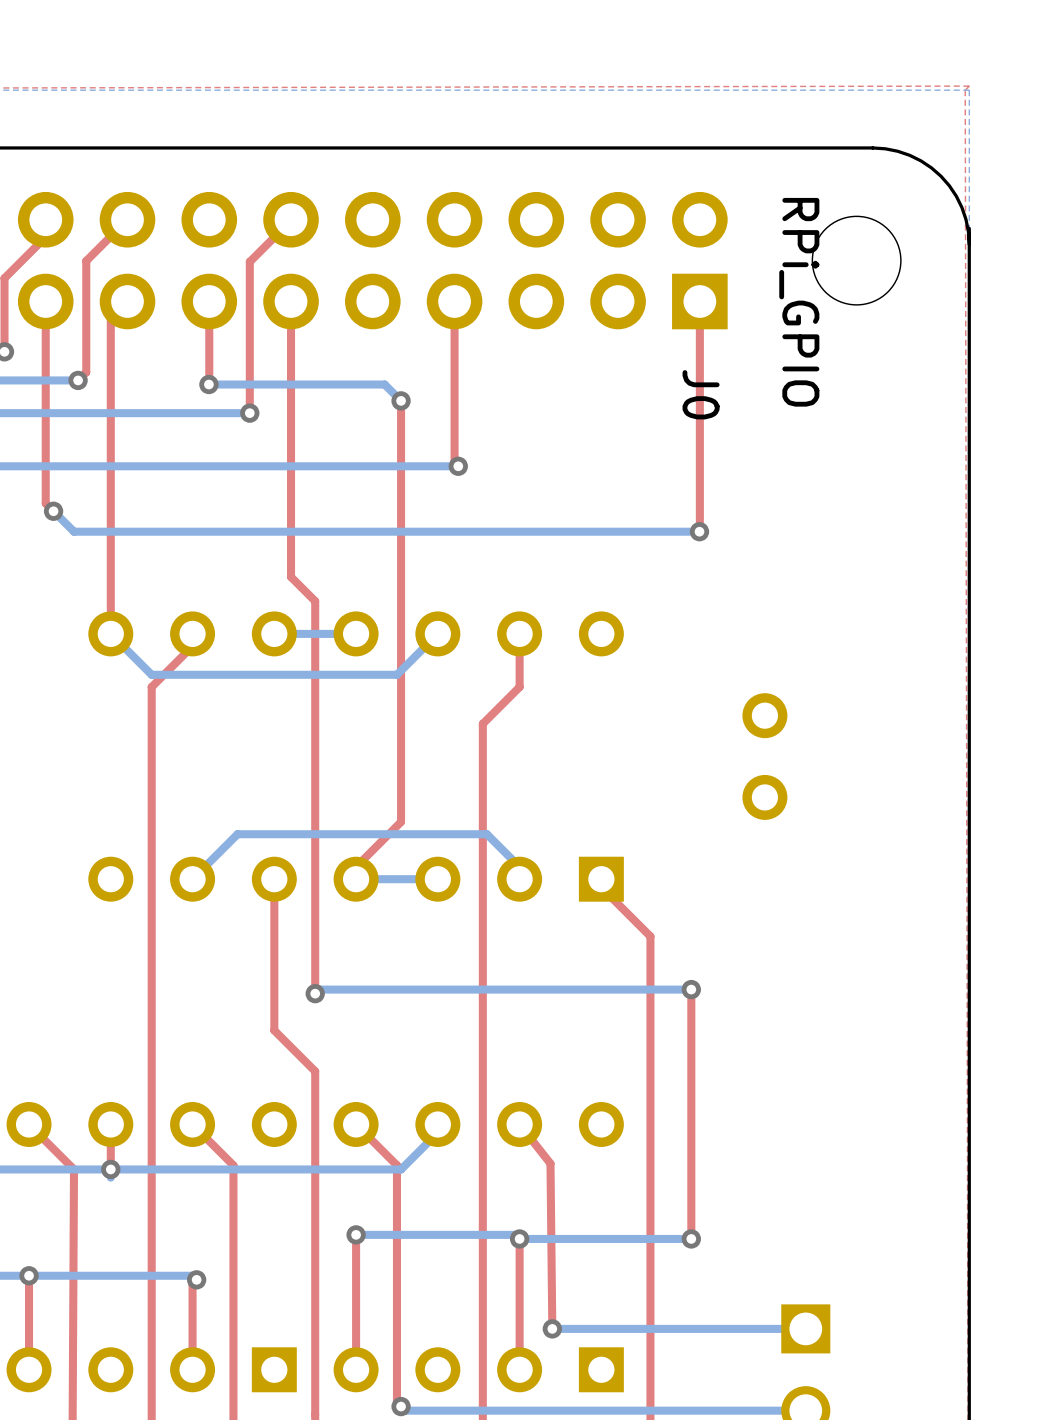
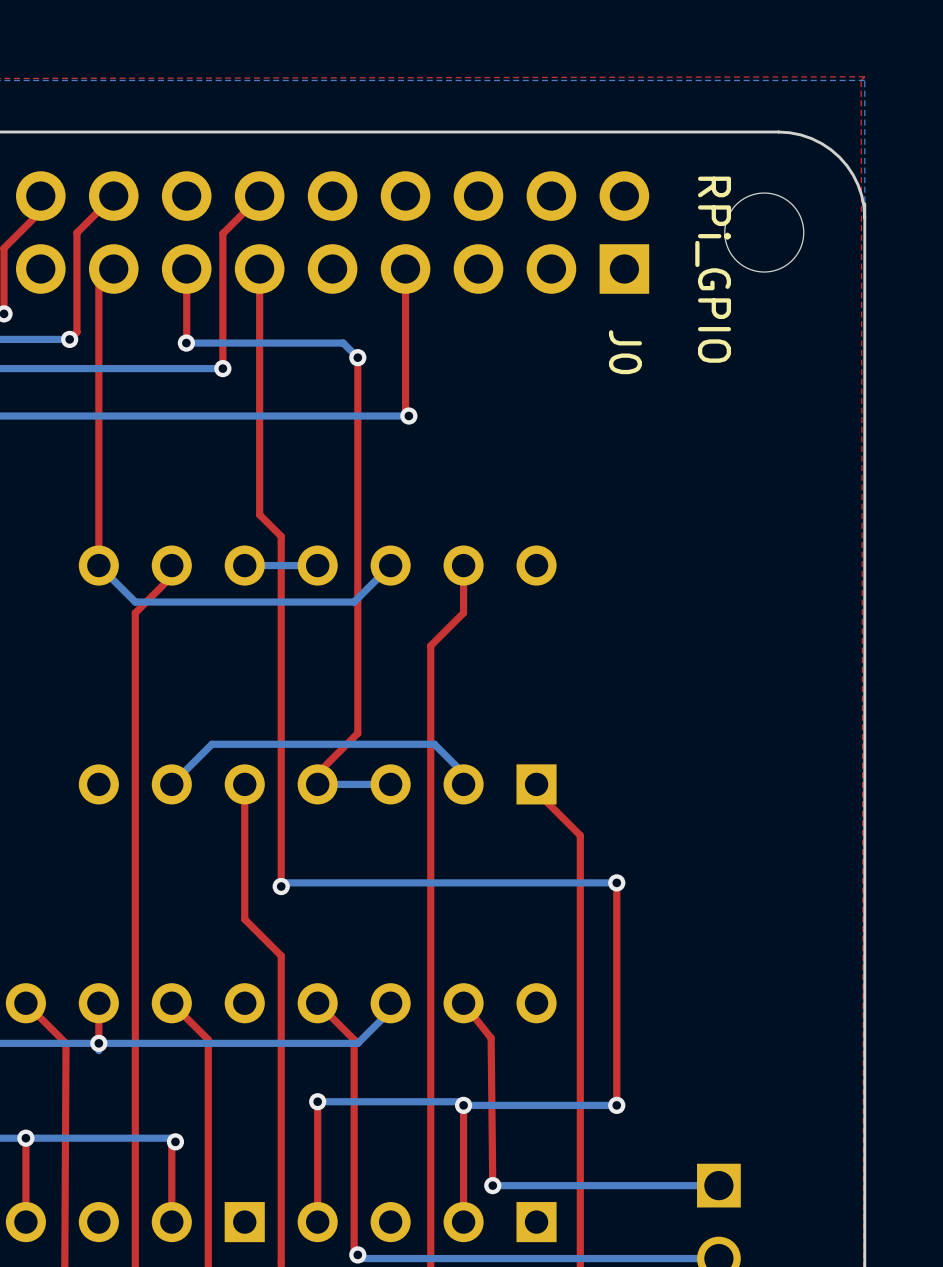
top track: (45, 301) (45, 503) (53, 511) -> none
top track: (699, 301) (699, 531) -> none
bottom track: (53, 511) (74, 531) (699, 531) -> none
via: (53, 511) -> none
via: (699, 531) -> none
part: (764, 756) -> none

